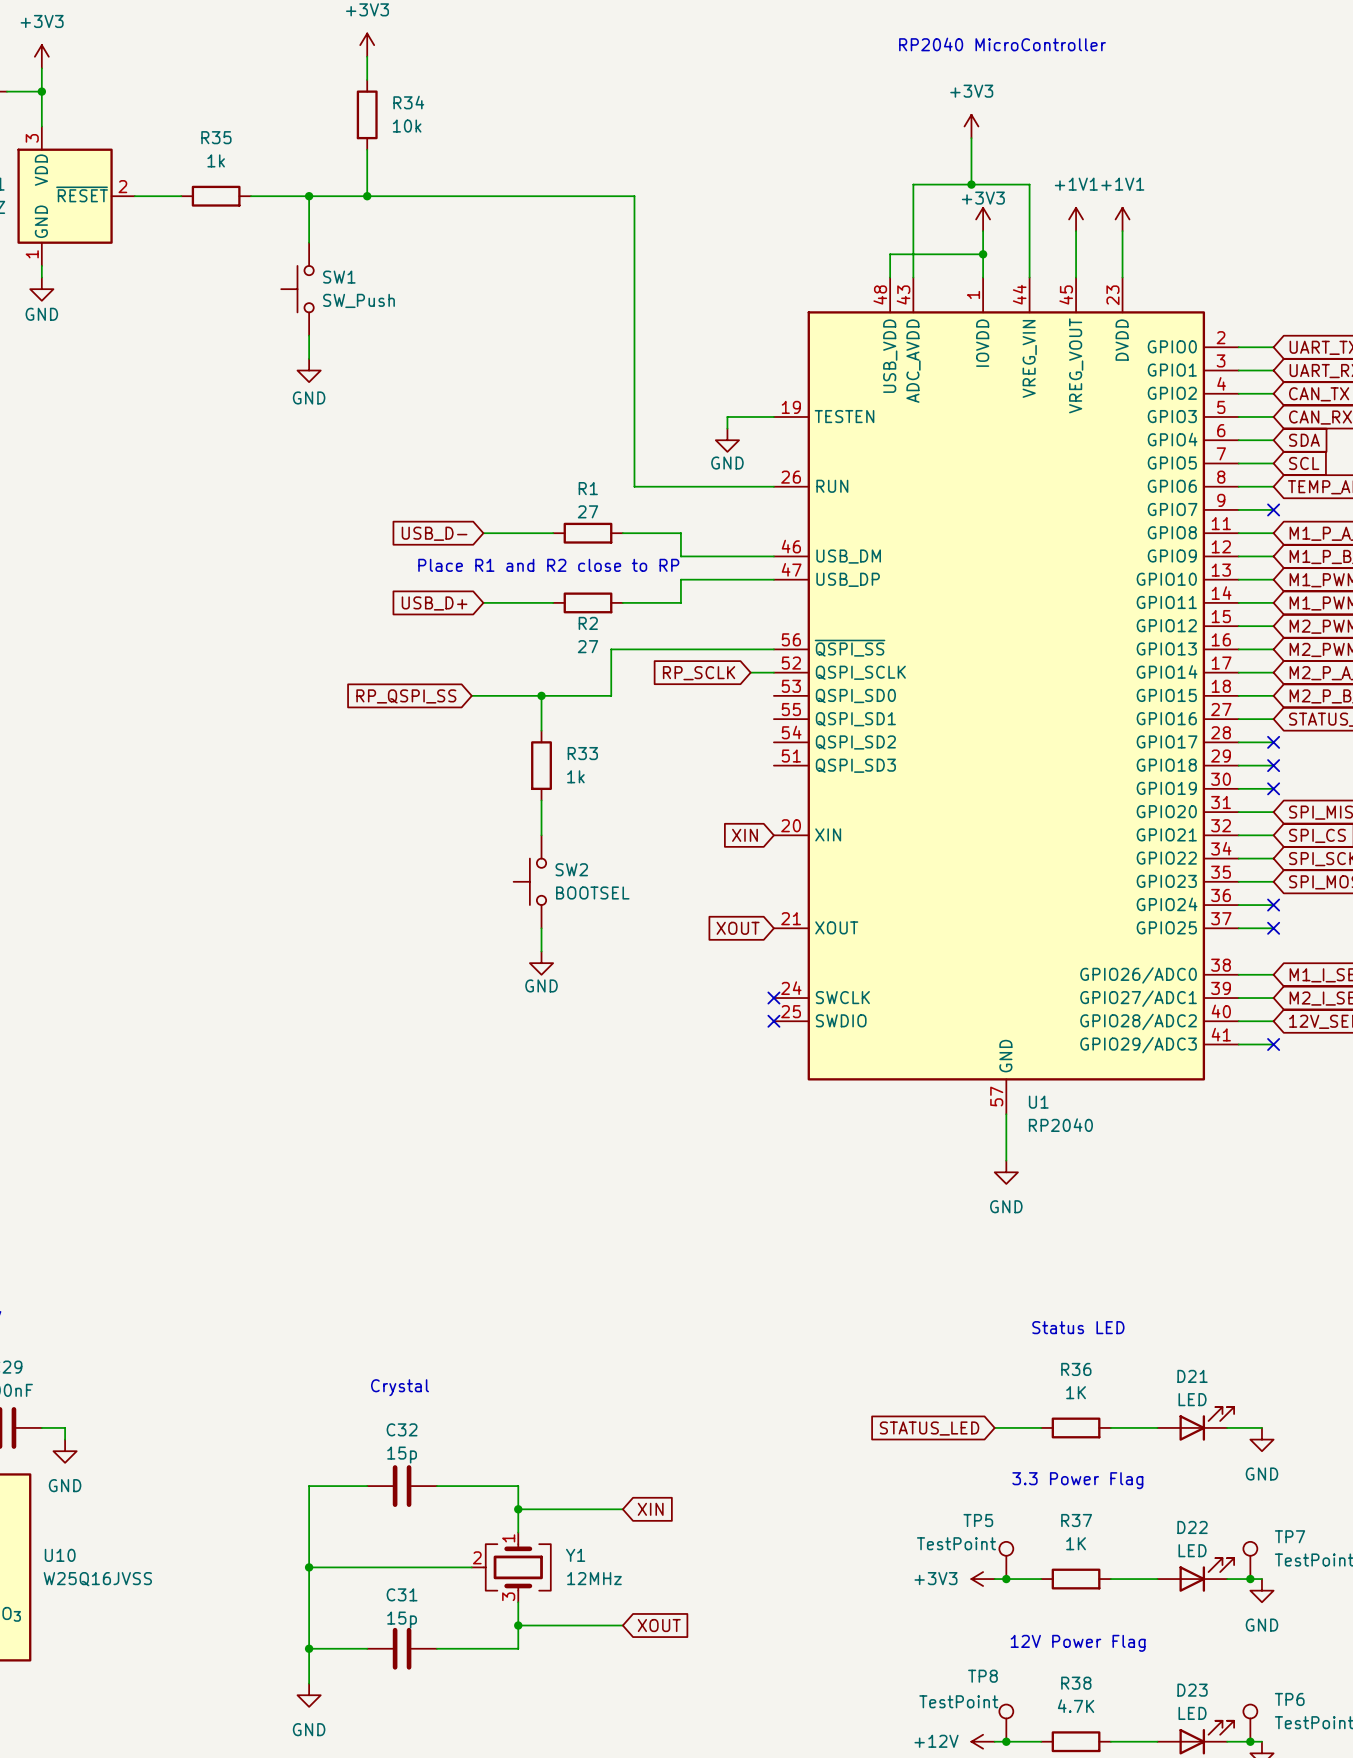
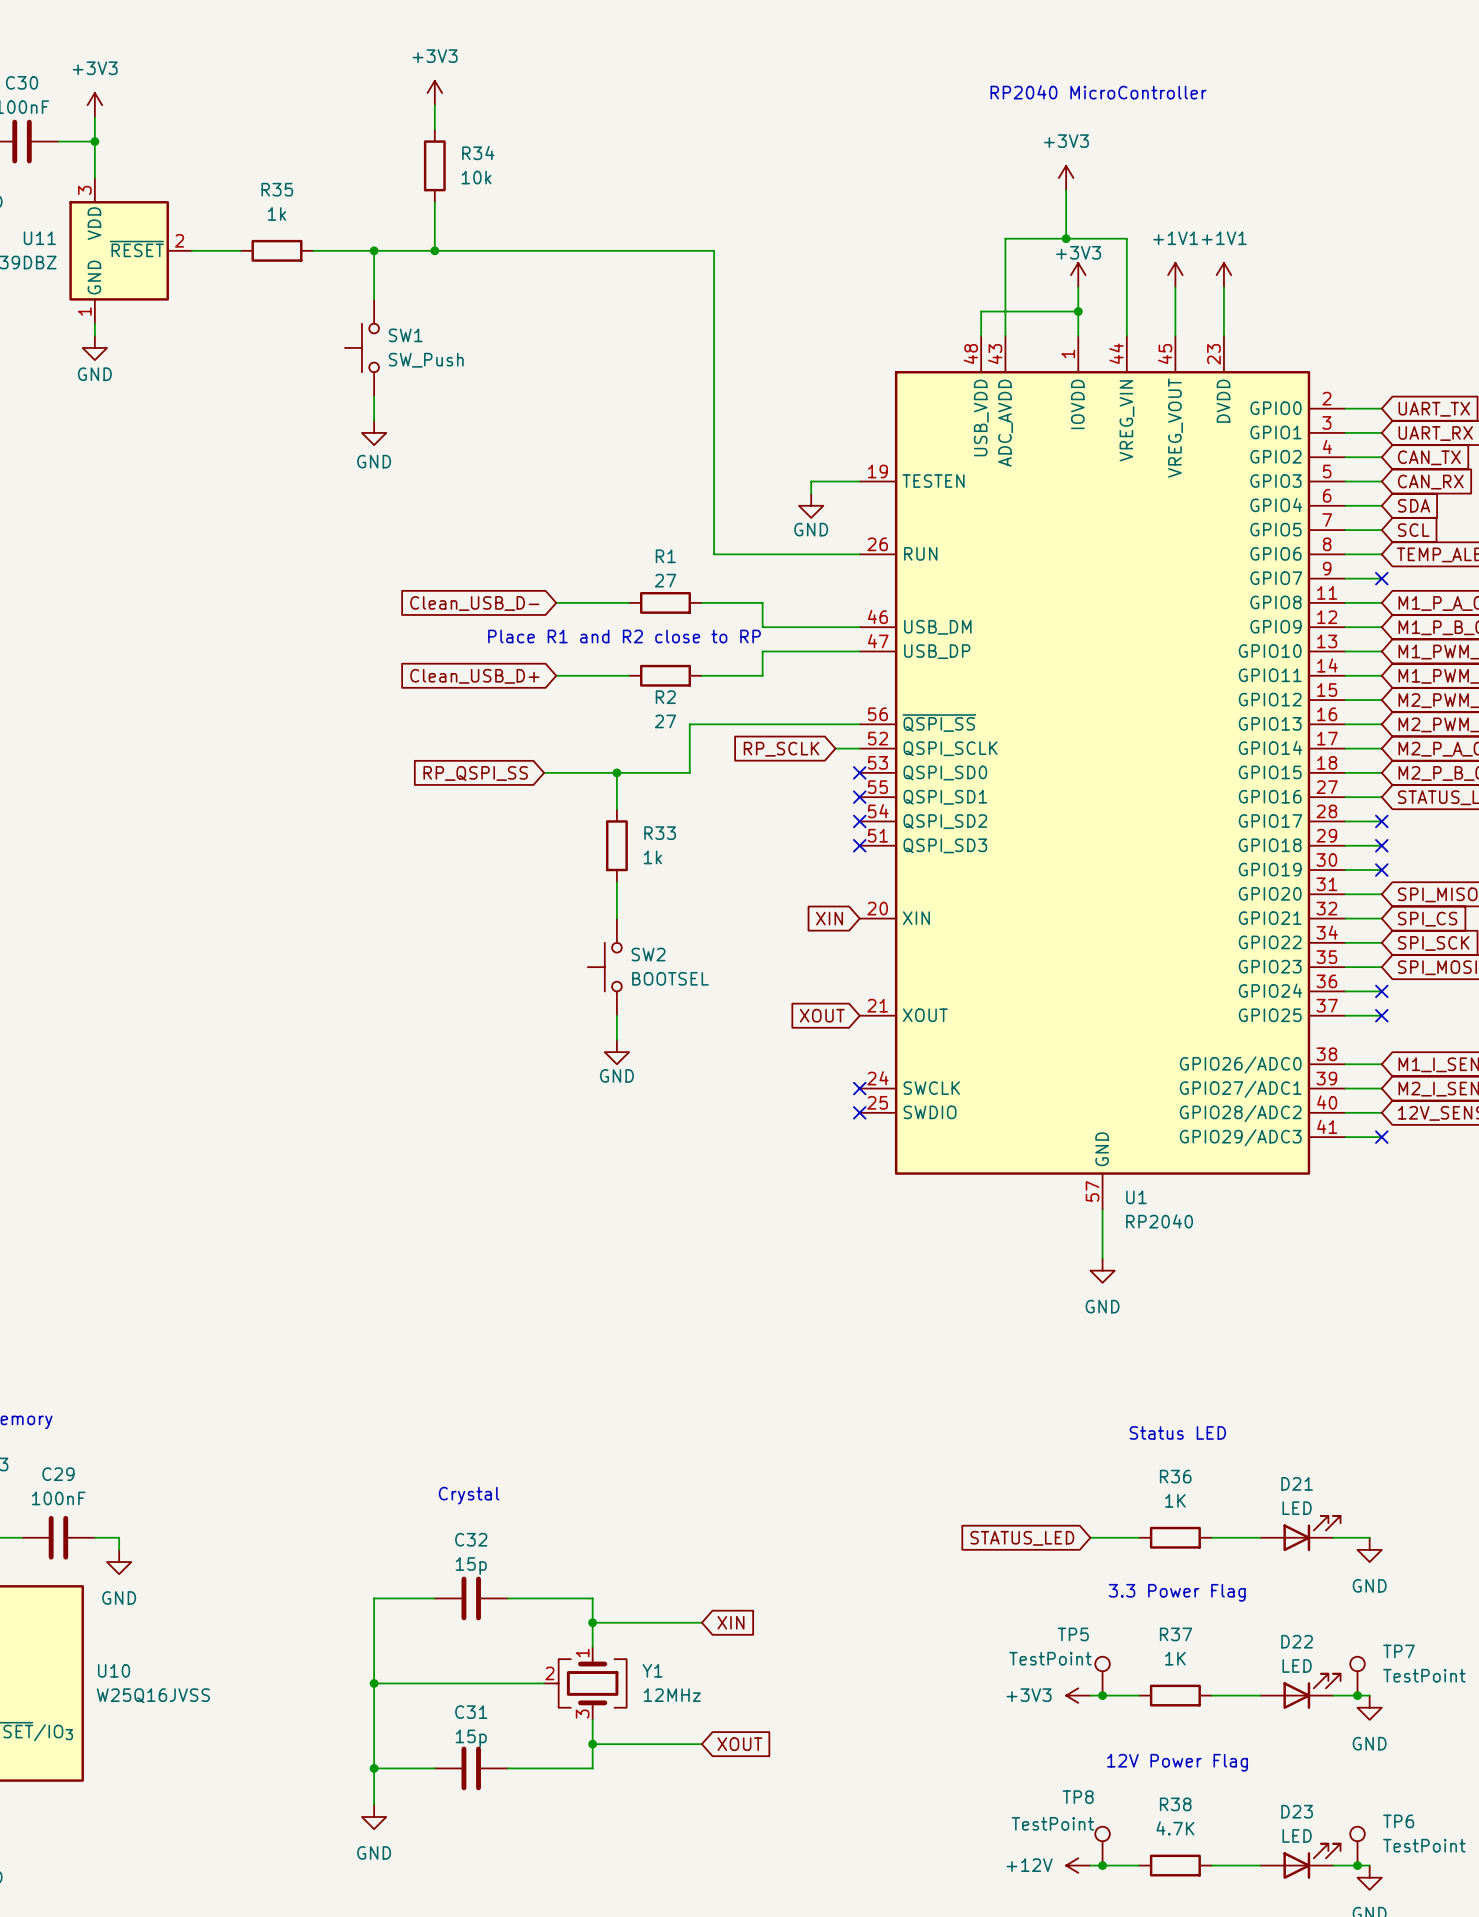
global label: USB_D- (434, 533) -> Clean_USB_D- (474, 603)
global label: USB_D+ (434, 603) -> Clean_USB_D+ (474, 676)
no-connect mark: none -> (859, 772)
no-connect mark: none -> (859, 797)
no-connect mark: none -> (859, 821)
no-connect mark: none -> (859, 845)

